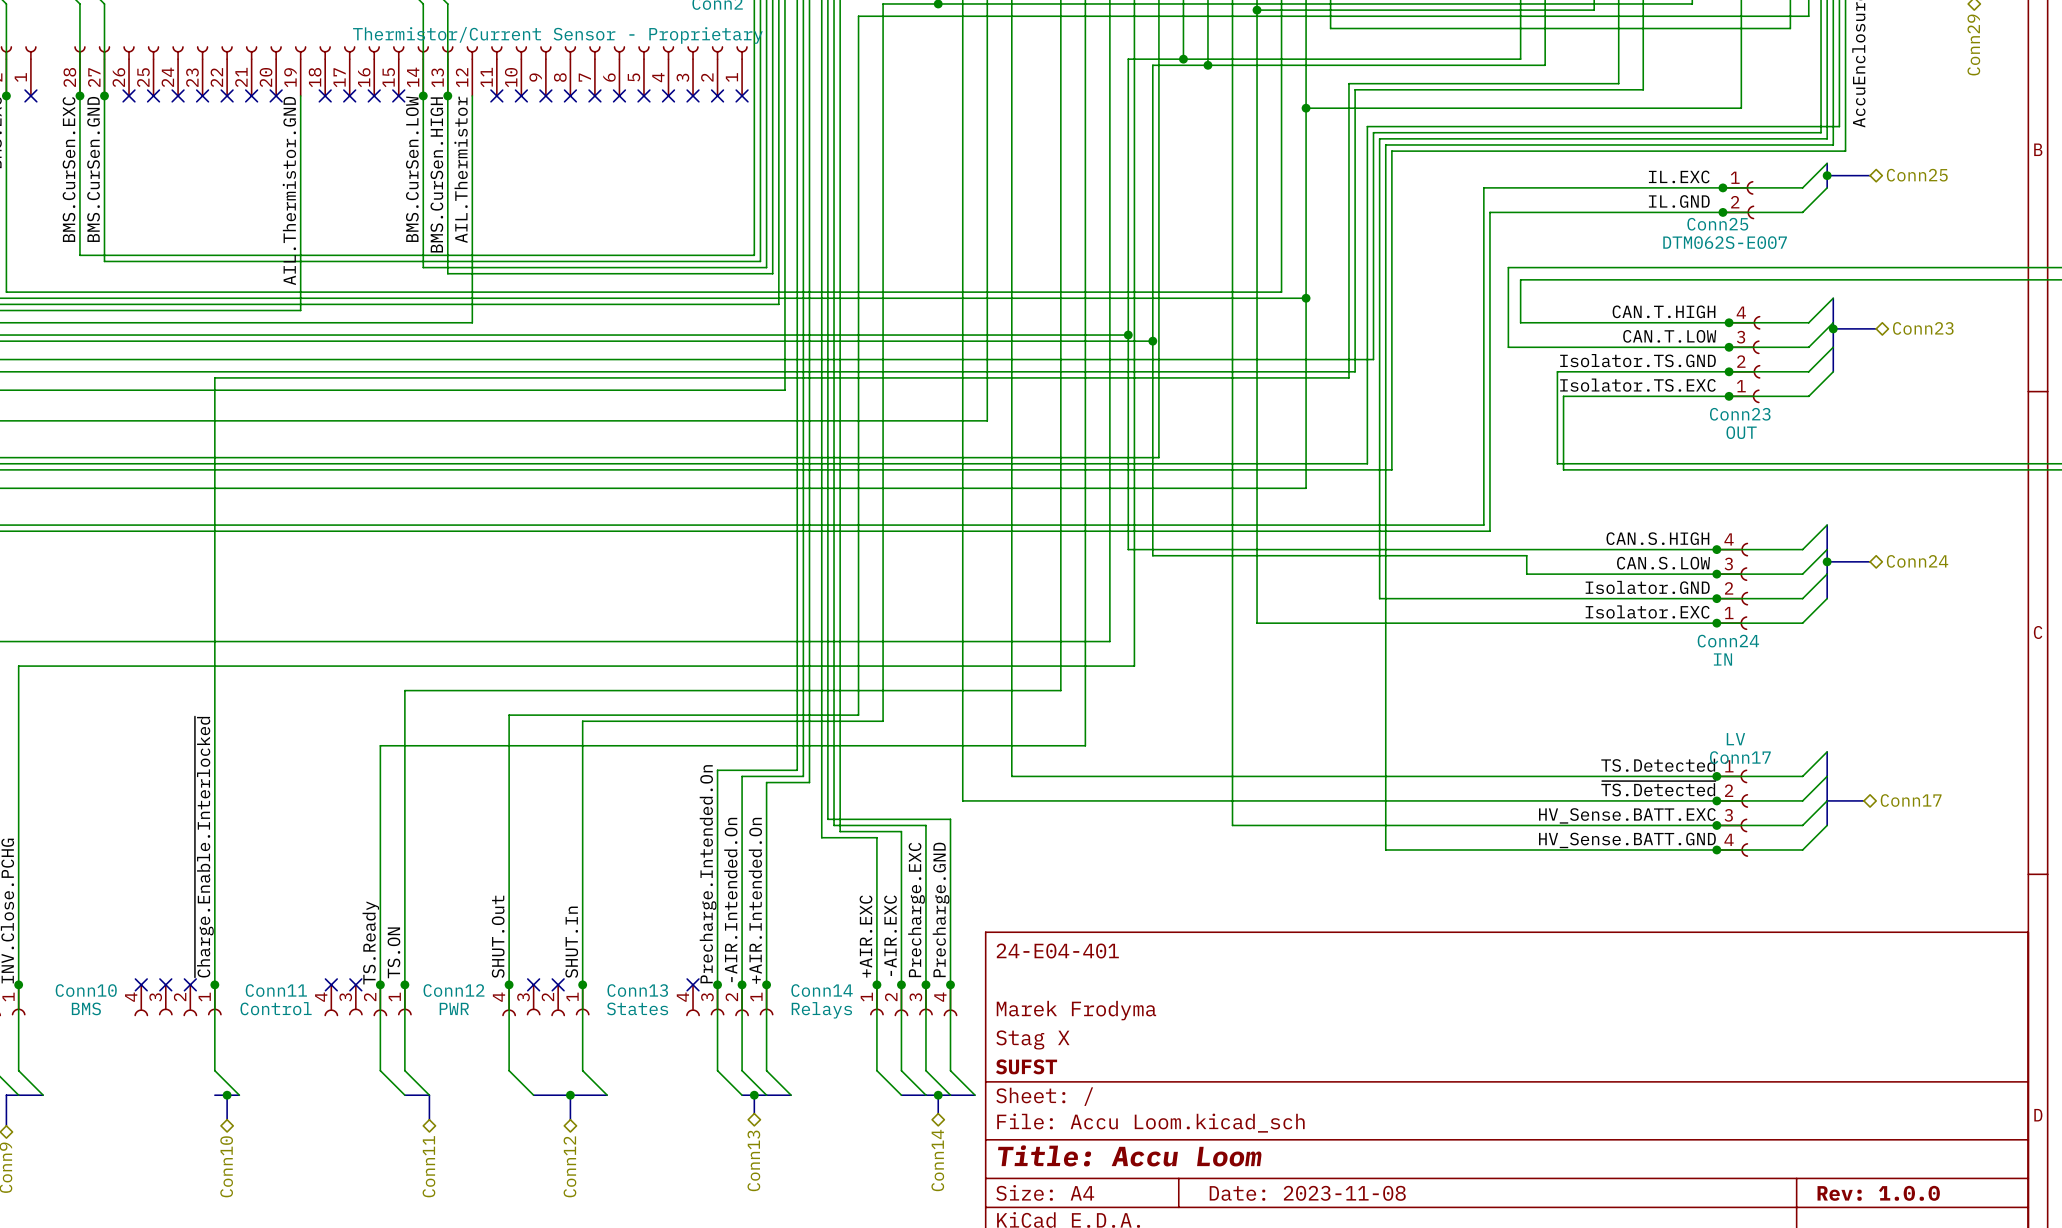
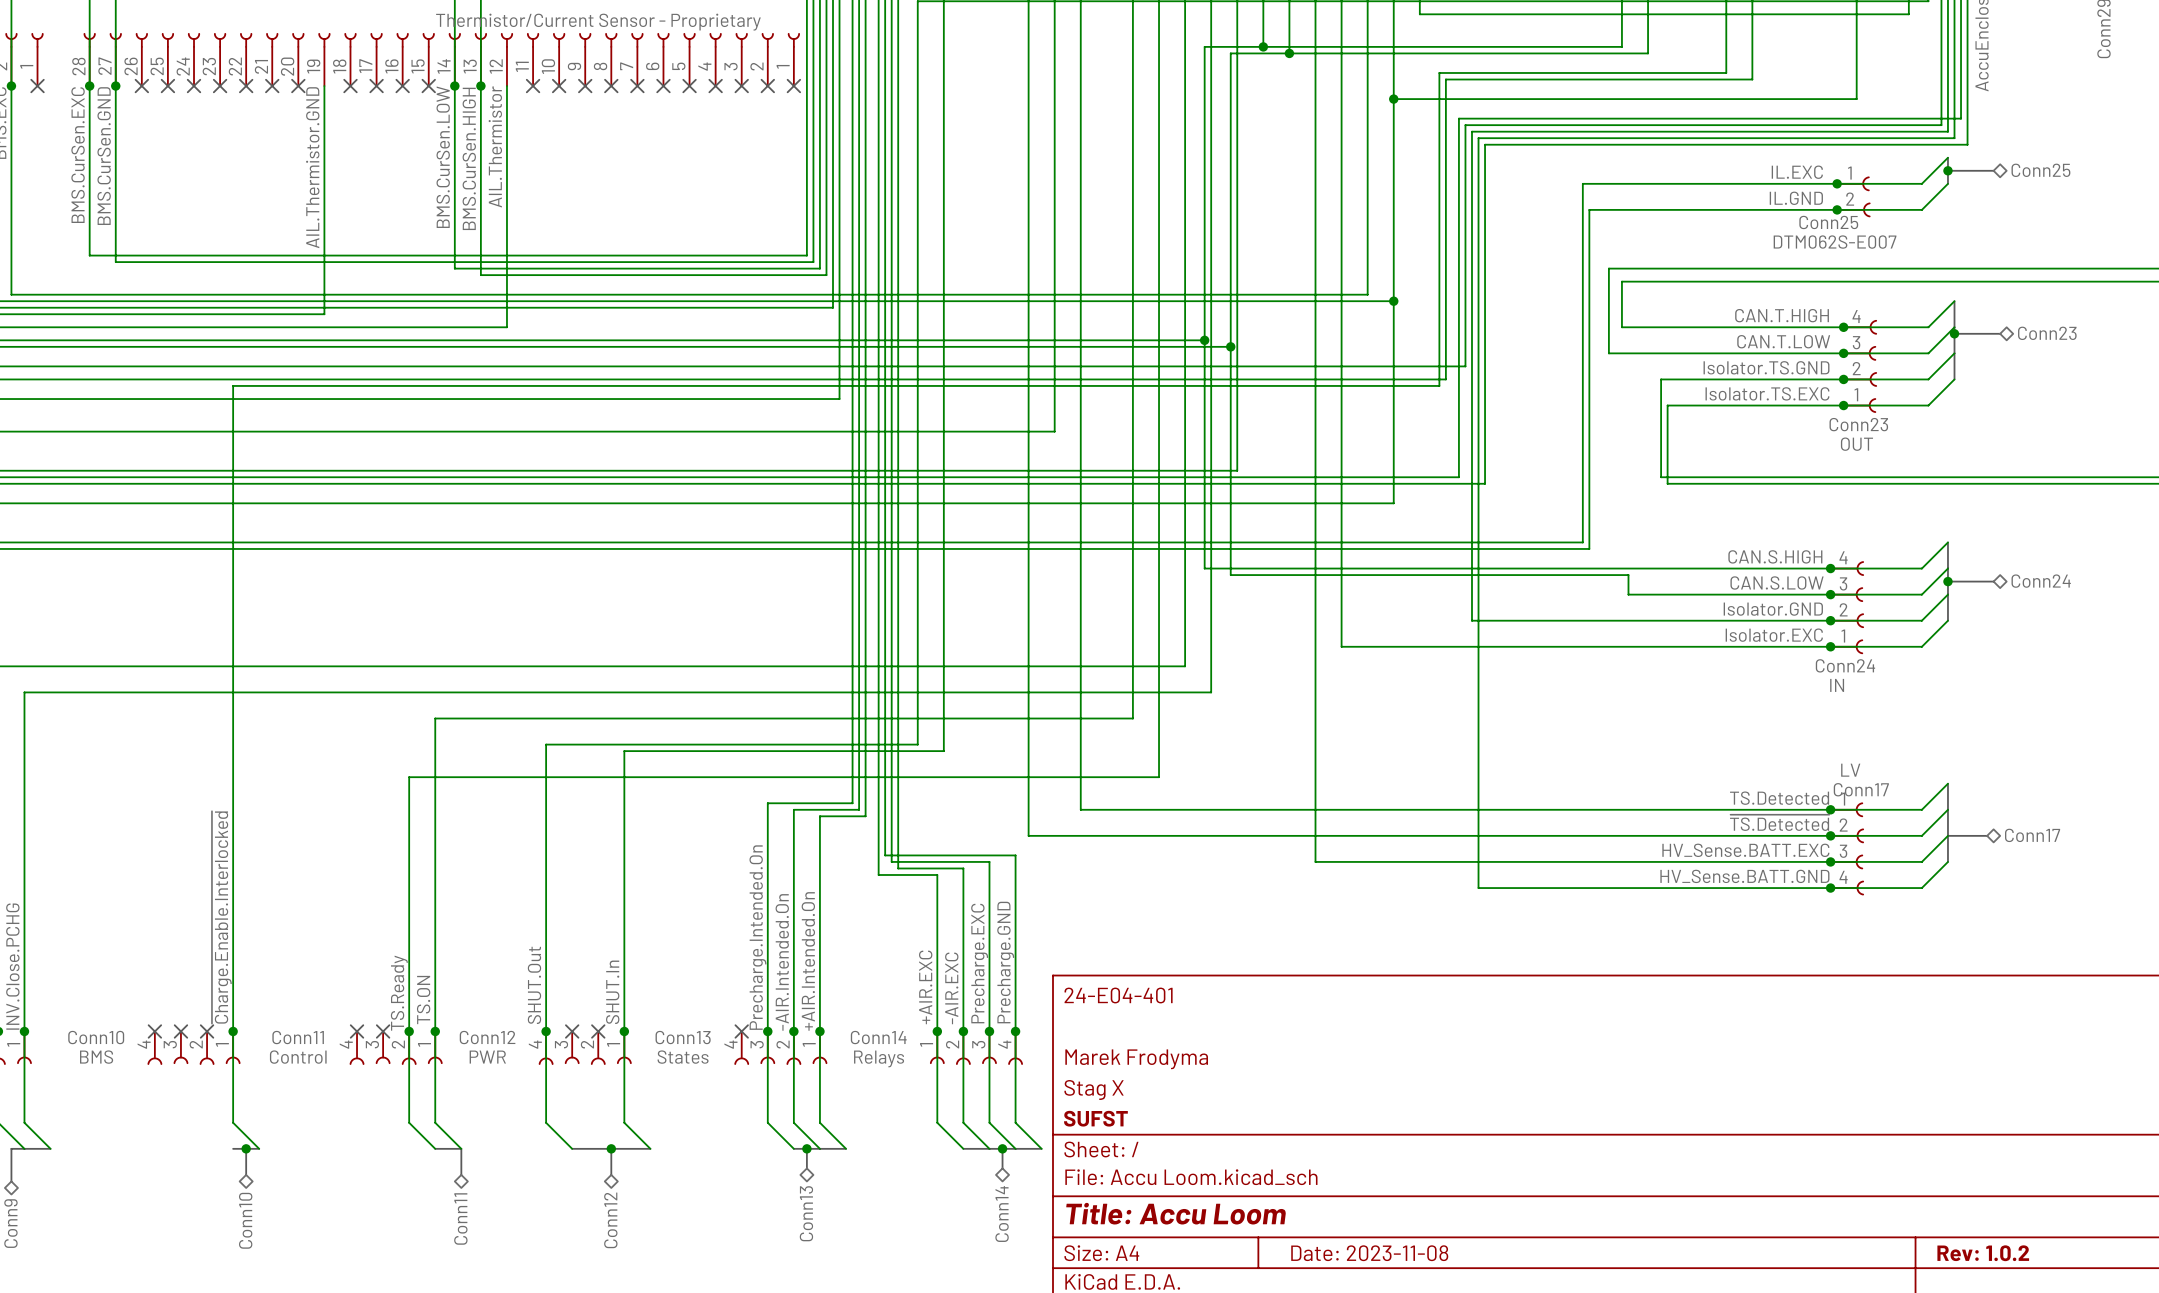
title block: Rev: 1.0.0 (1878, 1193) -> Rev: 1.0.2 (1983, 1253)

